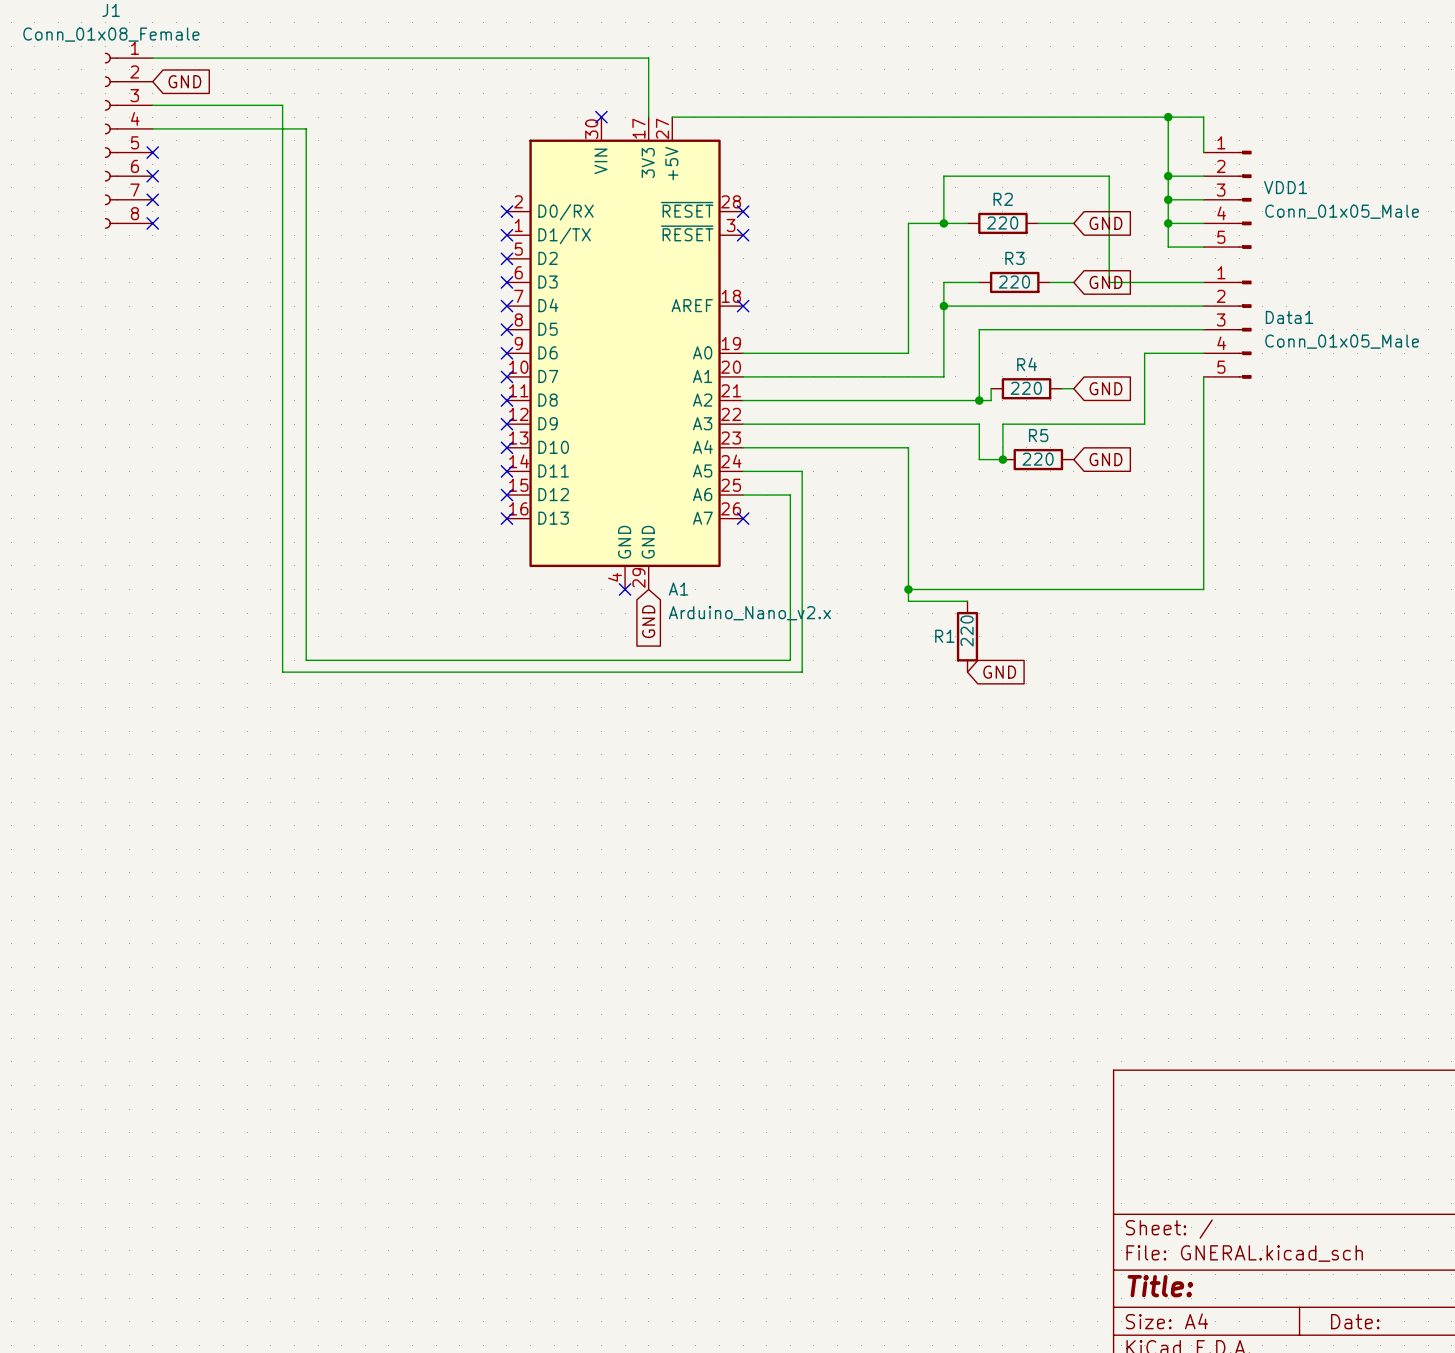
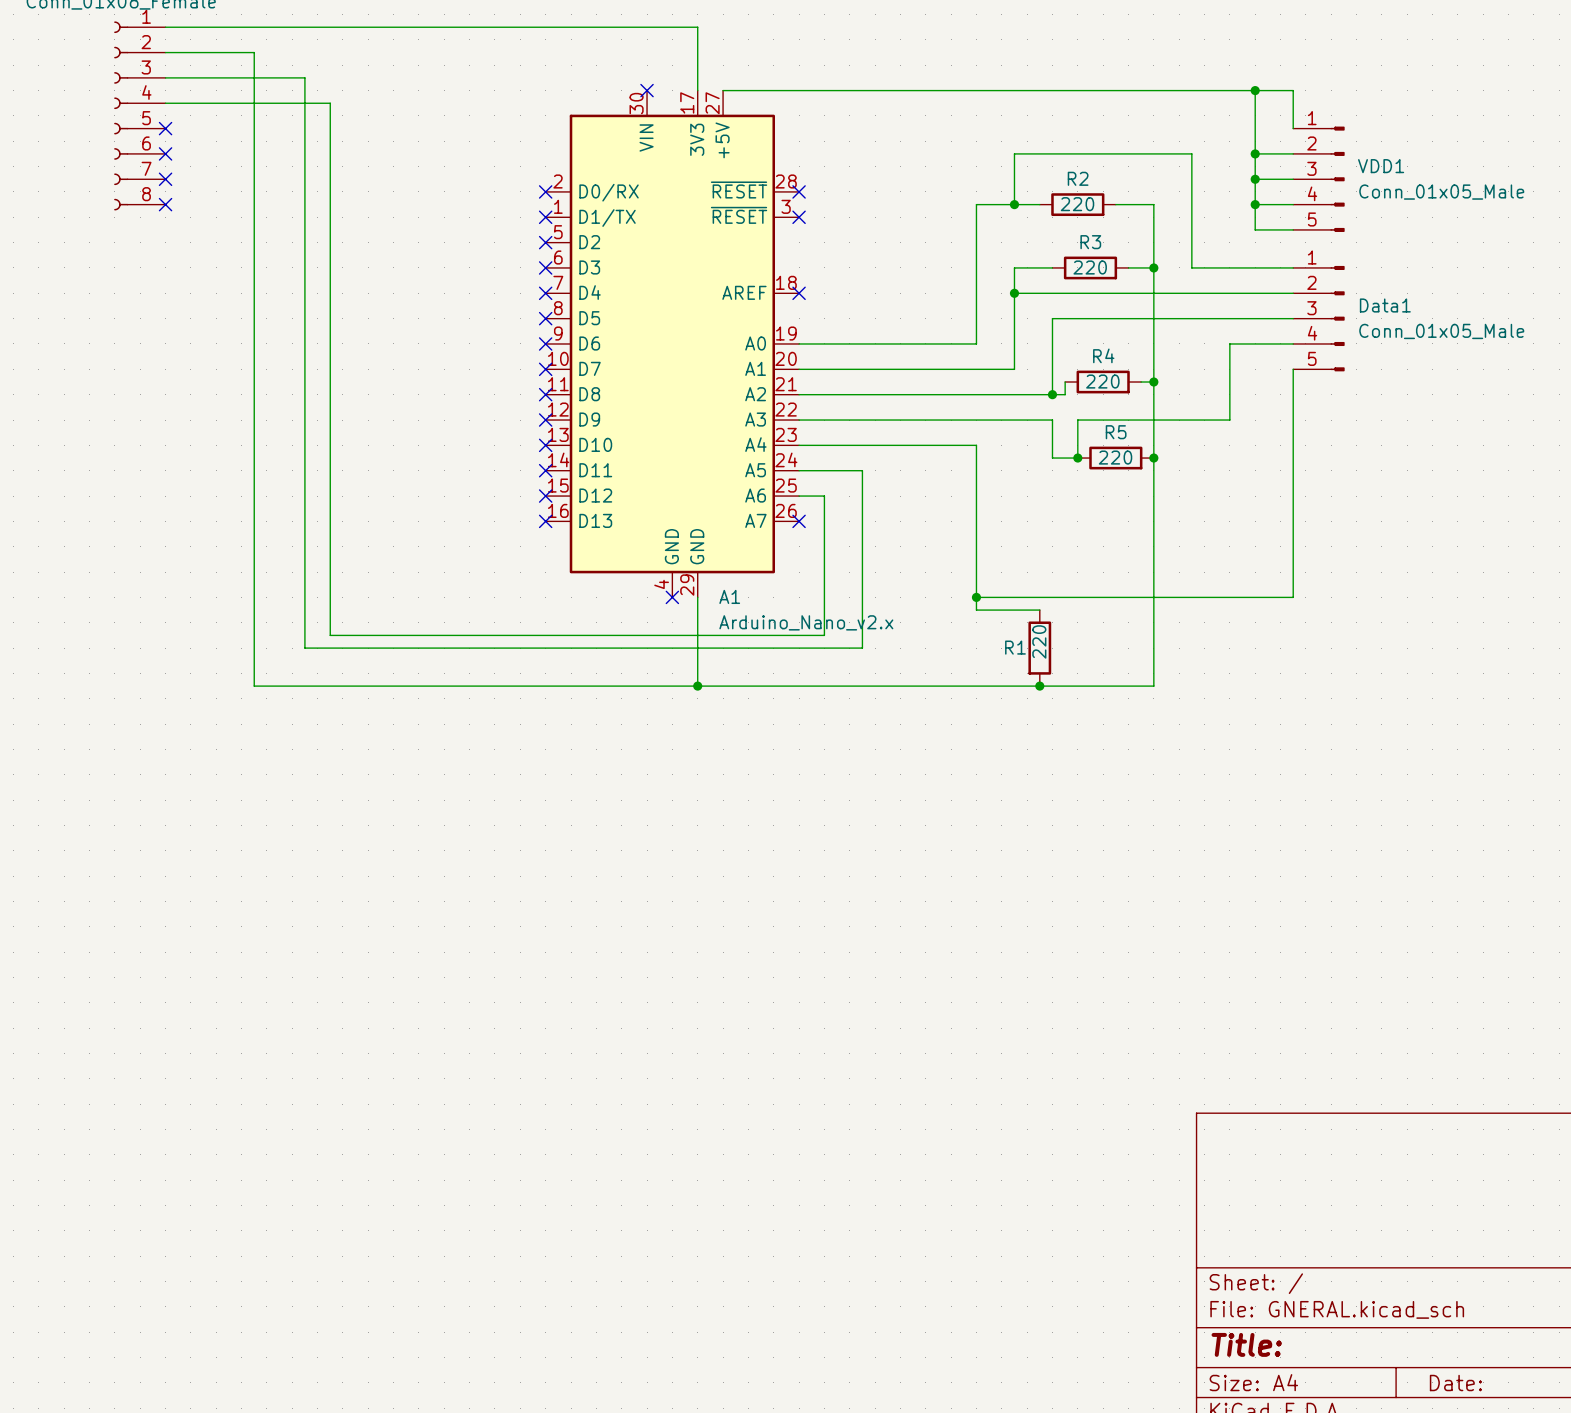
wire: none -> (165, 52) (254, 52) (254, 686) (304, 686)
global label: GND (184, 81) -> none
global label: GND (1105, 223) -> none
junction: none -> (1153, 267)
global label: GND (1105, 282) -> none
junction: none -> (1153, 382)
global label: GND (1105, 388) -> none
junction: none -> (1153, 458)
global label: GND (1105, 459) -> none
wire: (766, 495) (790, 495) (790, 660) (306, 660) (306, 624) -> (824, 496) (824, 635) (330, 635)
wire: none -> (697, 597) (697, 686)
global label: GND (648, 621) -> none
wire: (282, 636) (282, 672) -> (304, 648) (862, 648)
wire: (802, 636) (802, 672) -> (1153, 204) (1153, 686) (862, 686)
junction: none -> (697, 686)
junction: none -> (1039, 686)
global label: GND (999, 672) -> none

